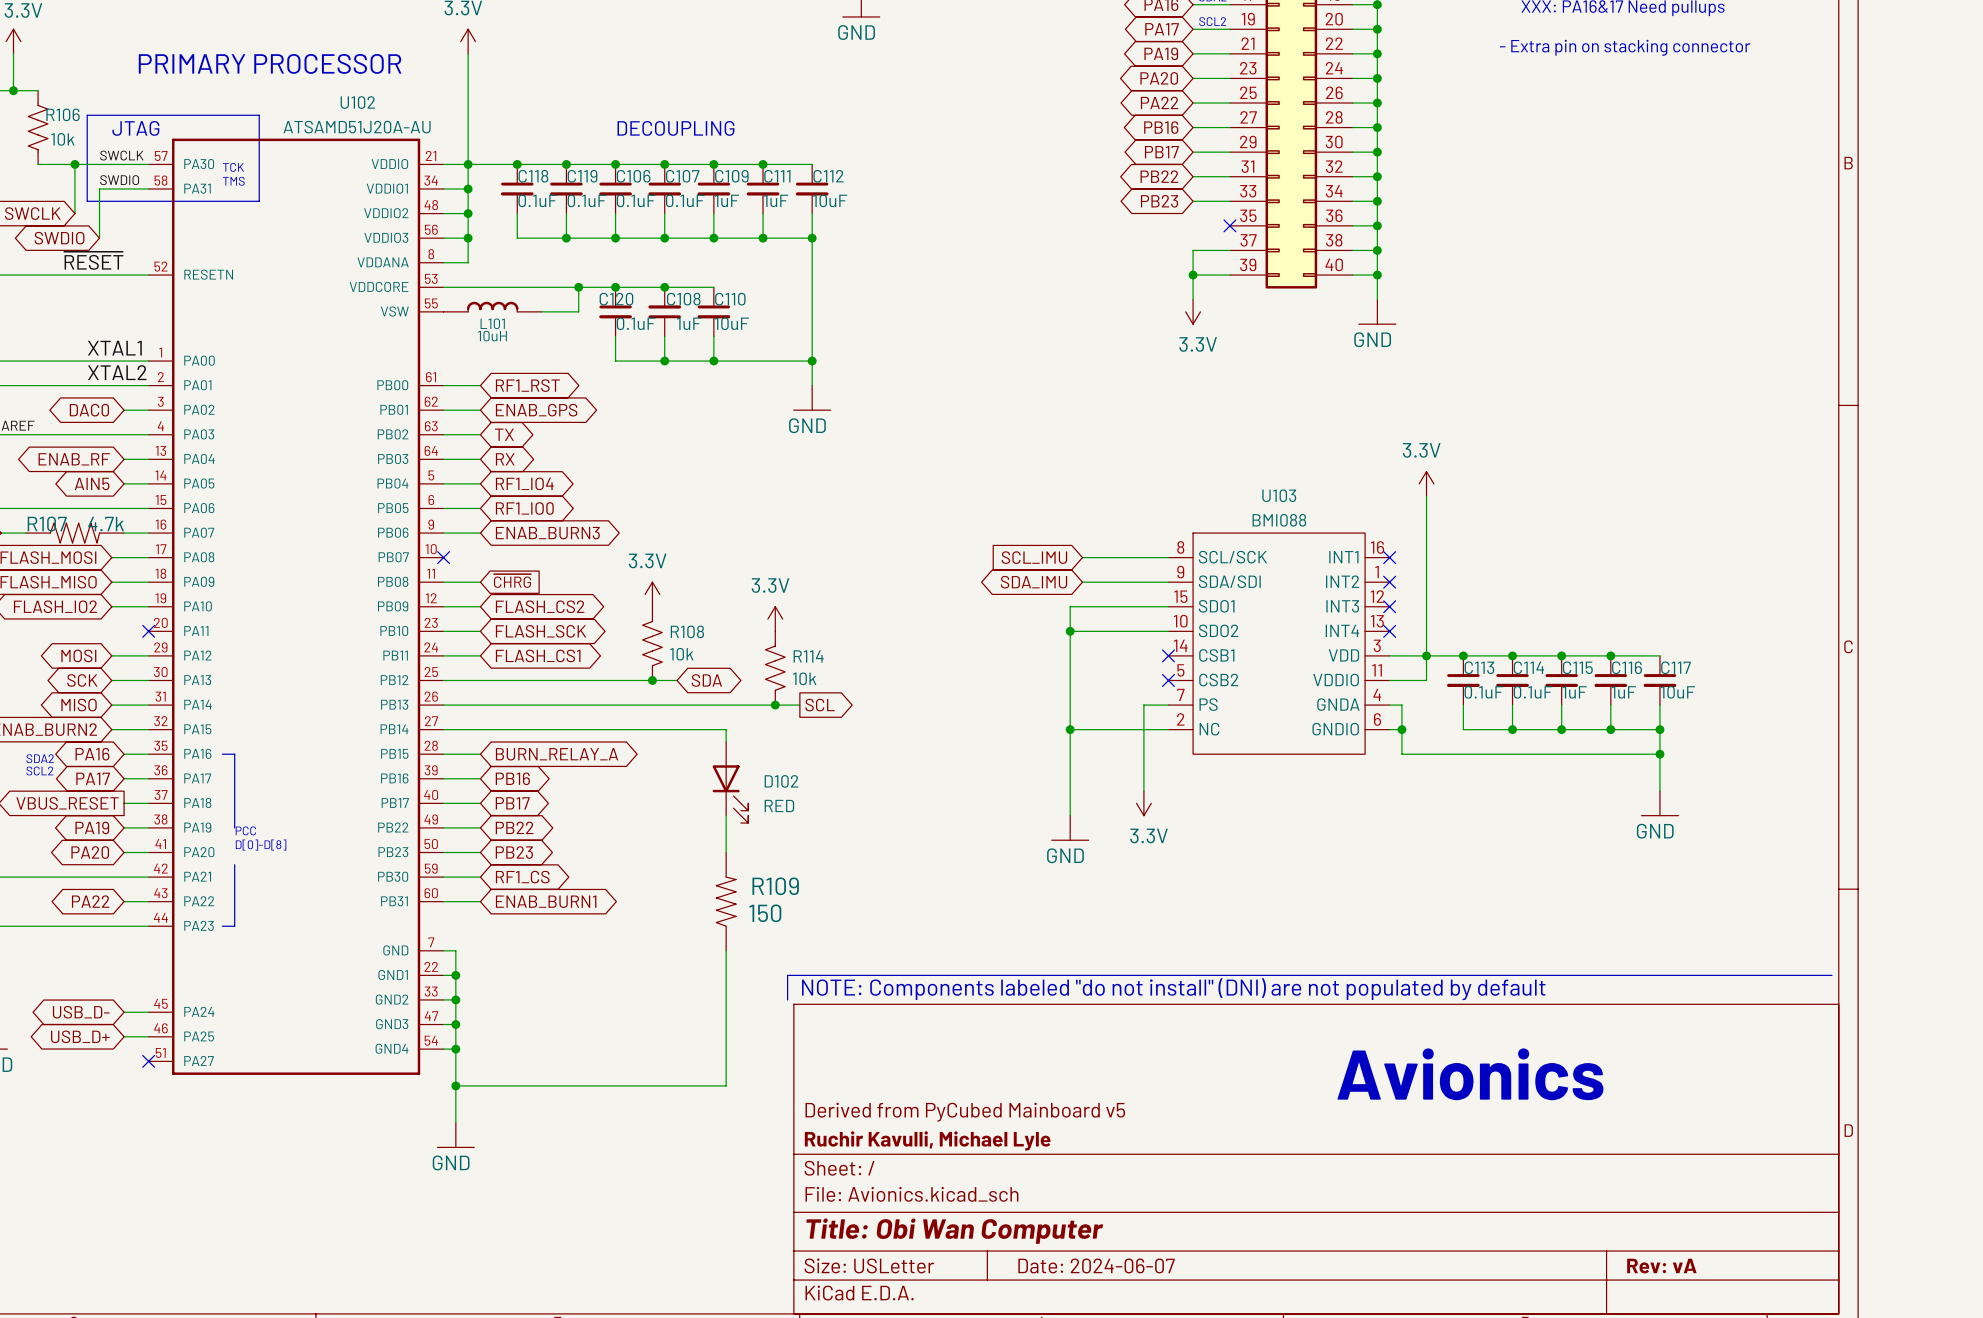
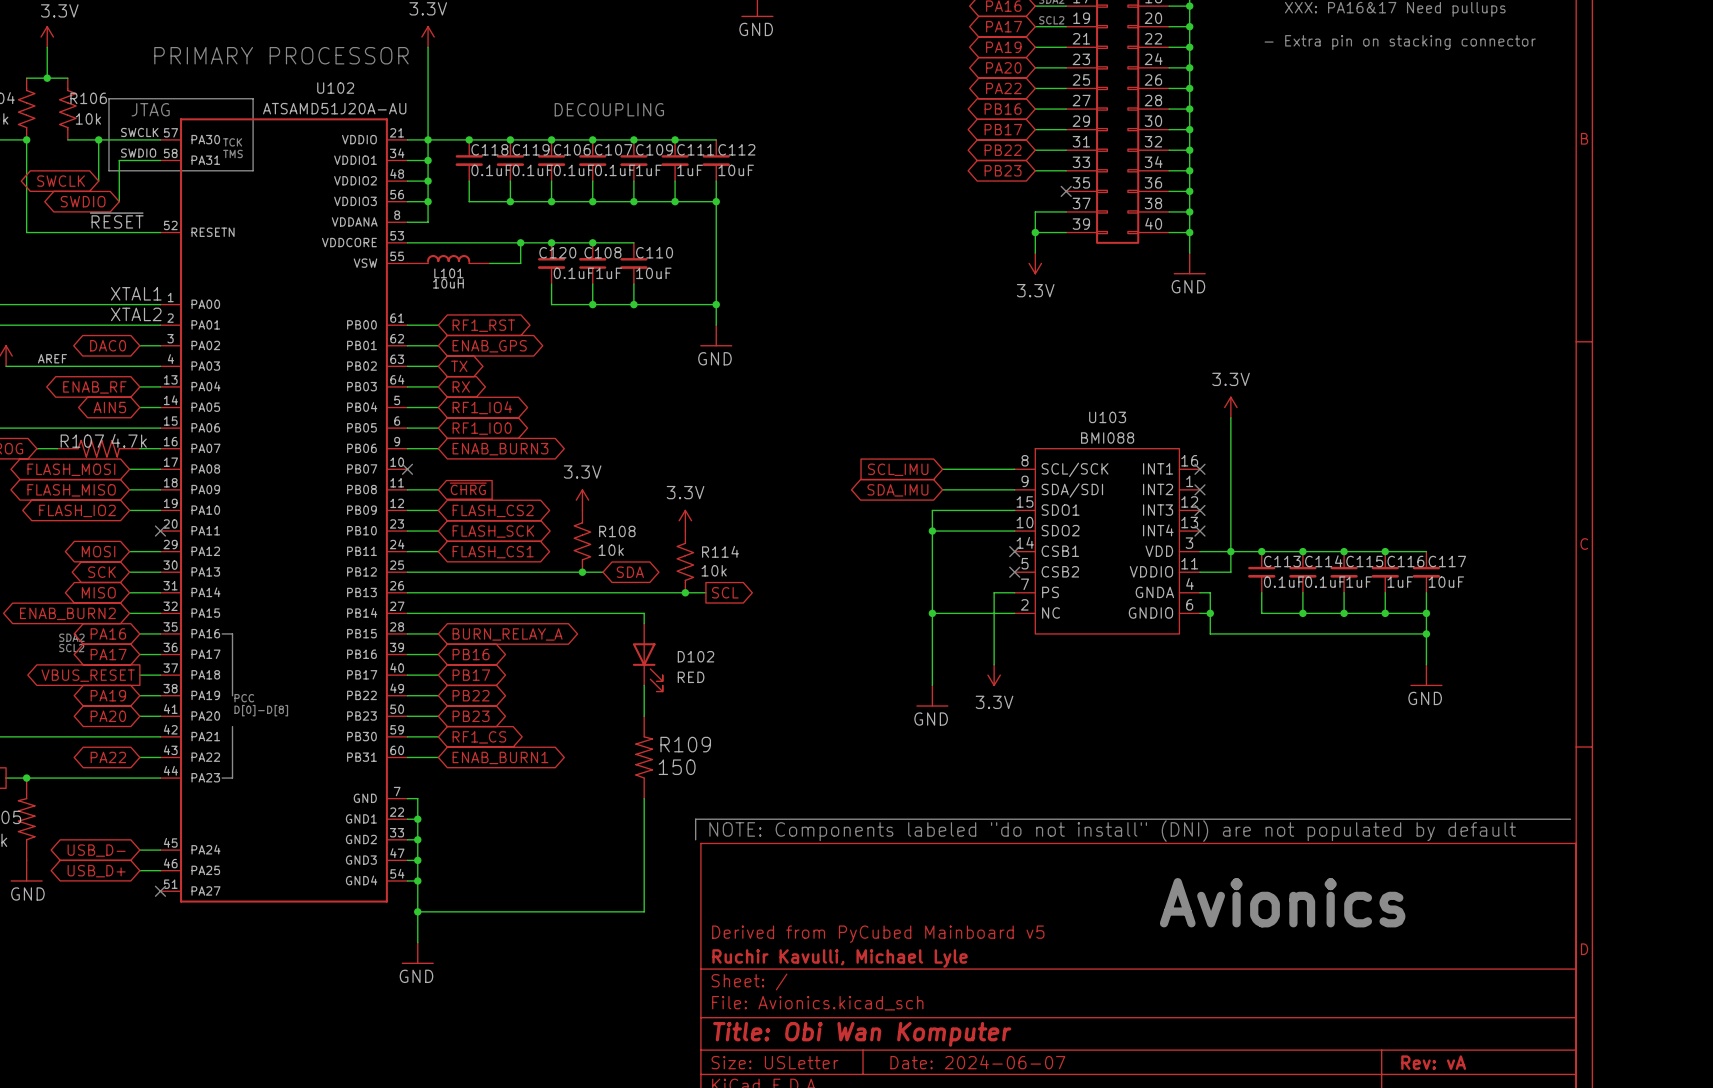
title block: Title: Obi Wan Computer (954, 1231) -> Title: Obi Wan Komputer (862, 1034)

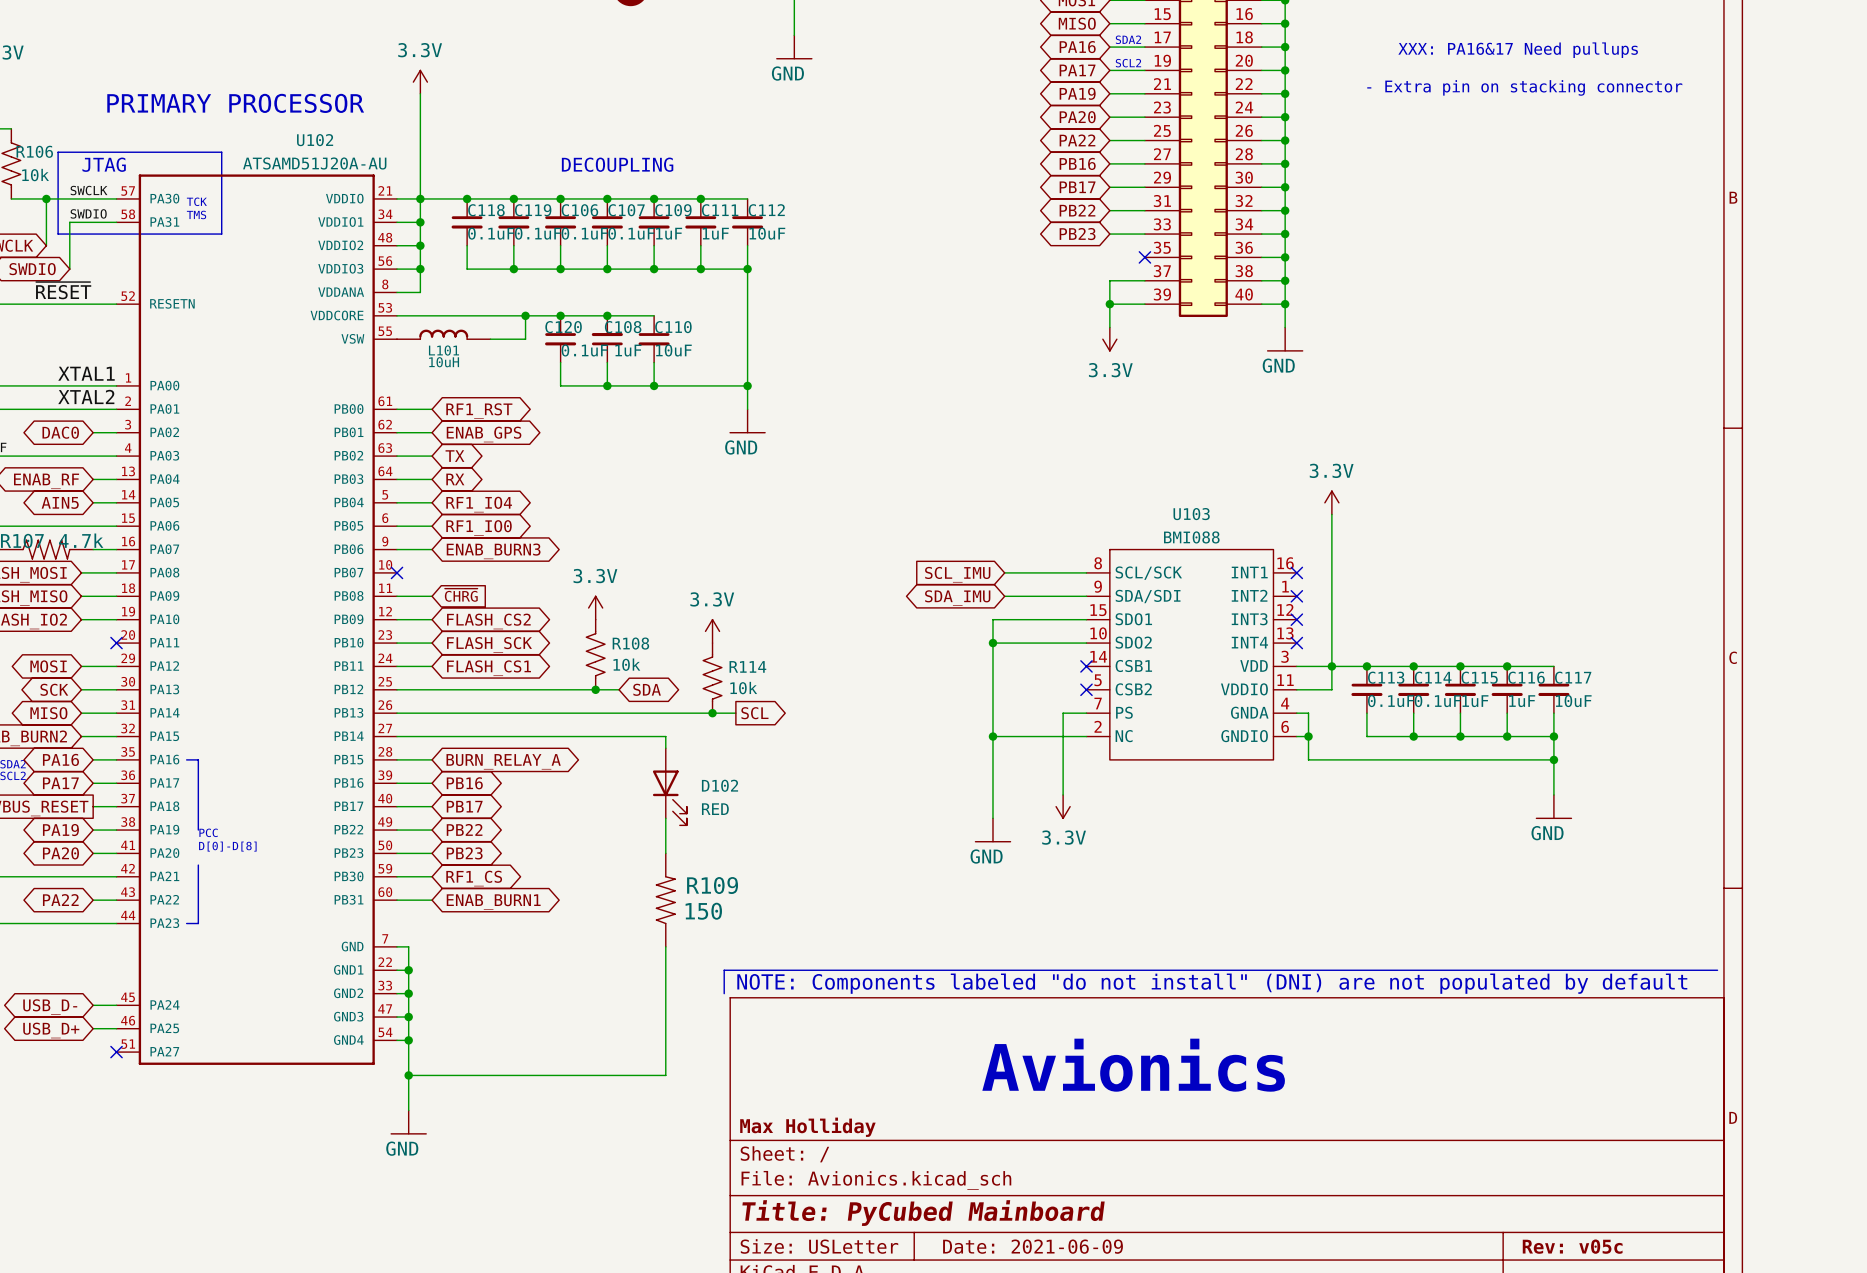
text: Avionics (1282, 902) -> none
text: none -> Avionics (1133, 1065)
title block: Derived from PyCubed Mainboard v5 (878, 934) -> none
title block: Ruchir Kavulli, Michael Lyle (840, 958) -> Max Holliday (807, 1127)
title block: Title: Obi Wan Komputer (862, 1034) -> Title: PyCubed Mainboard (923, 1213)
title block: Date: 2024-06-07 (977, 1062) -> Date: 2021-06-09 (1033, 1246)
title block: Rev: vA (1433, 1062) -> Rev: v05c (1572, 1246)

